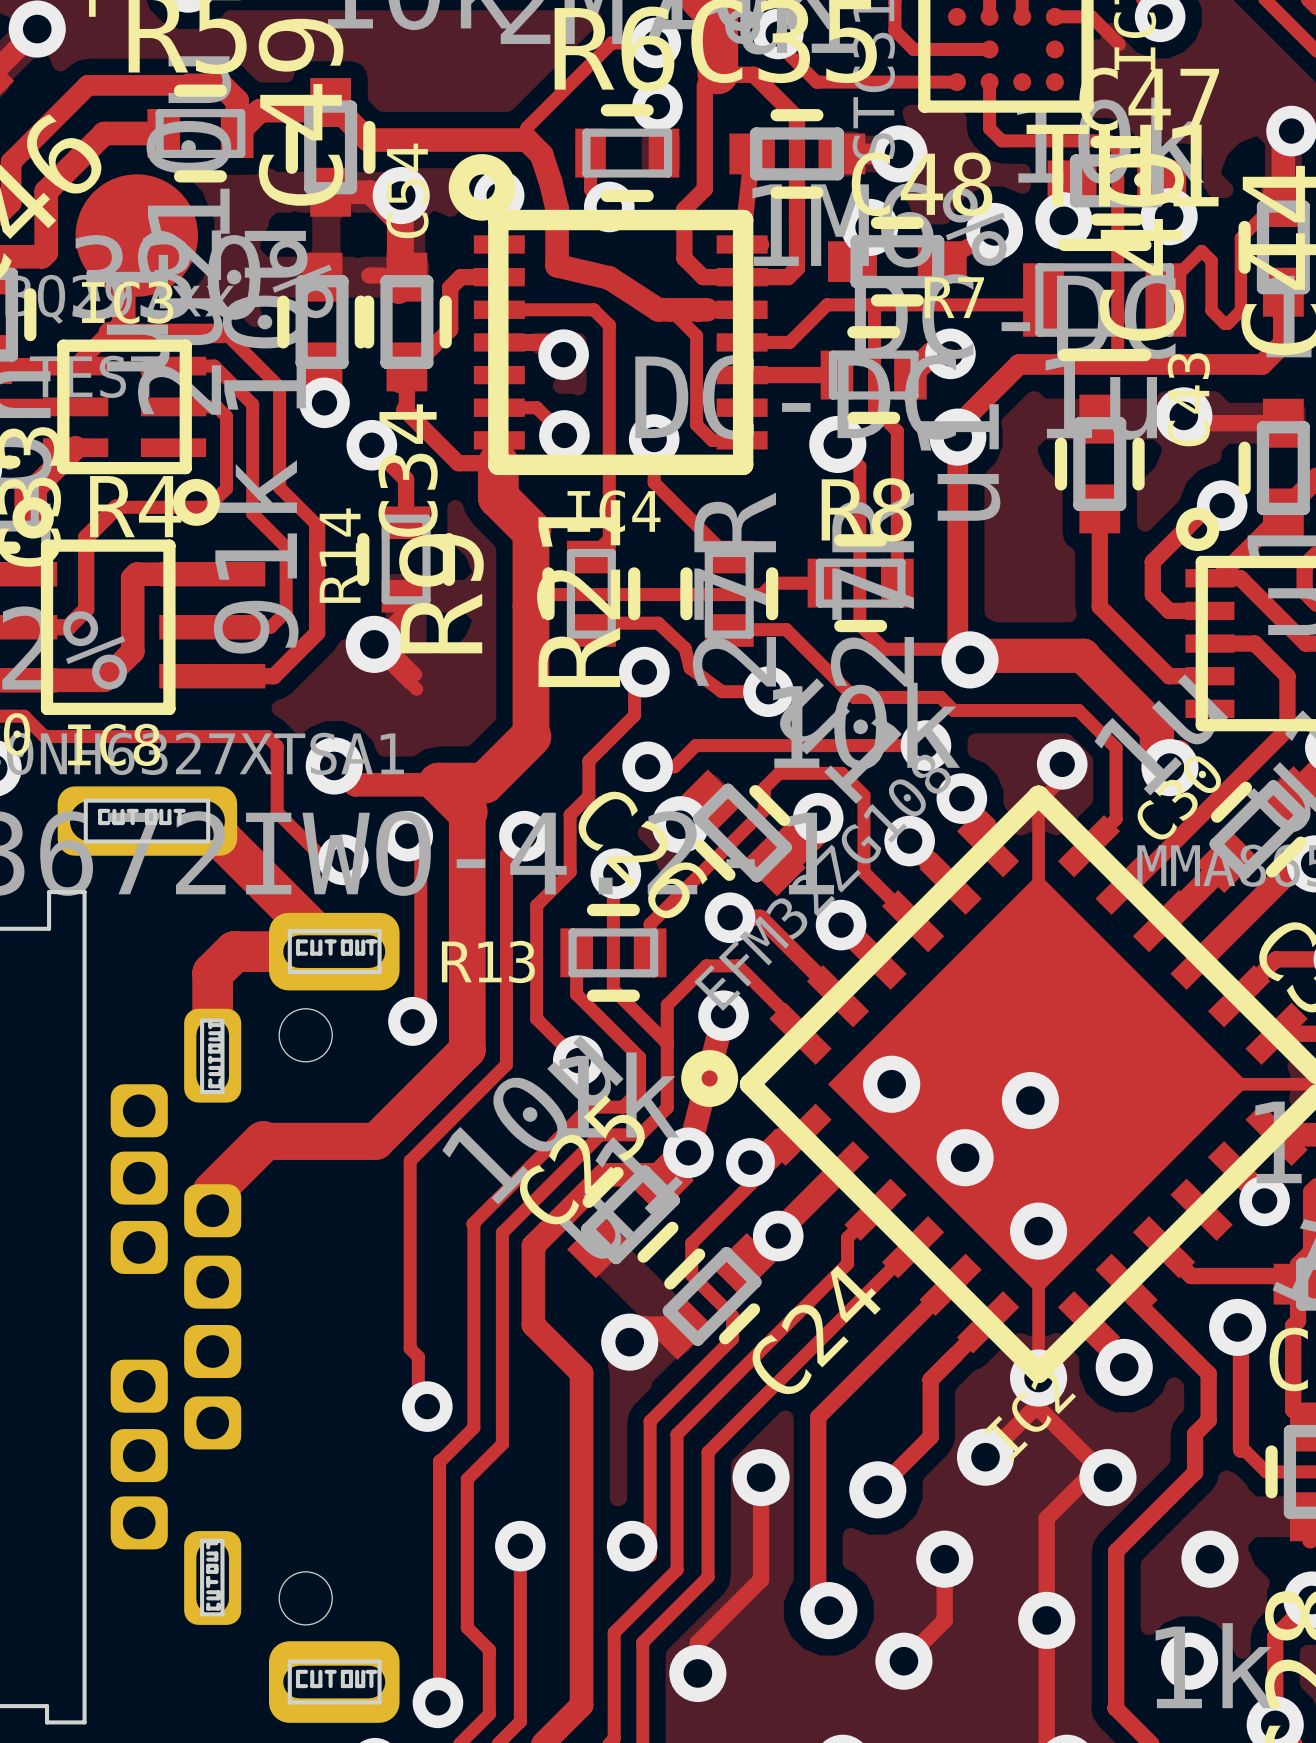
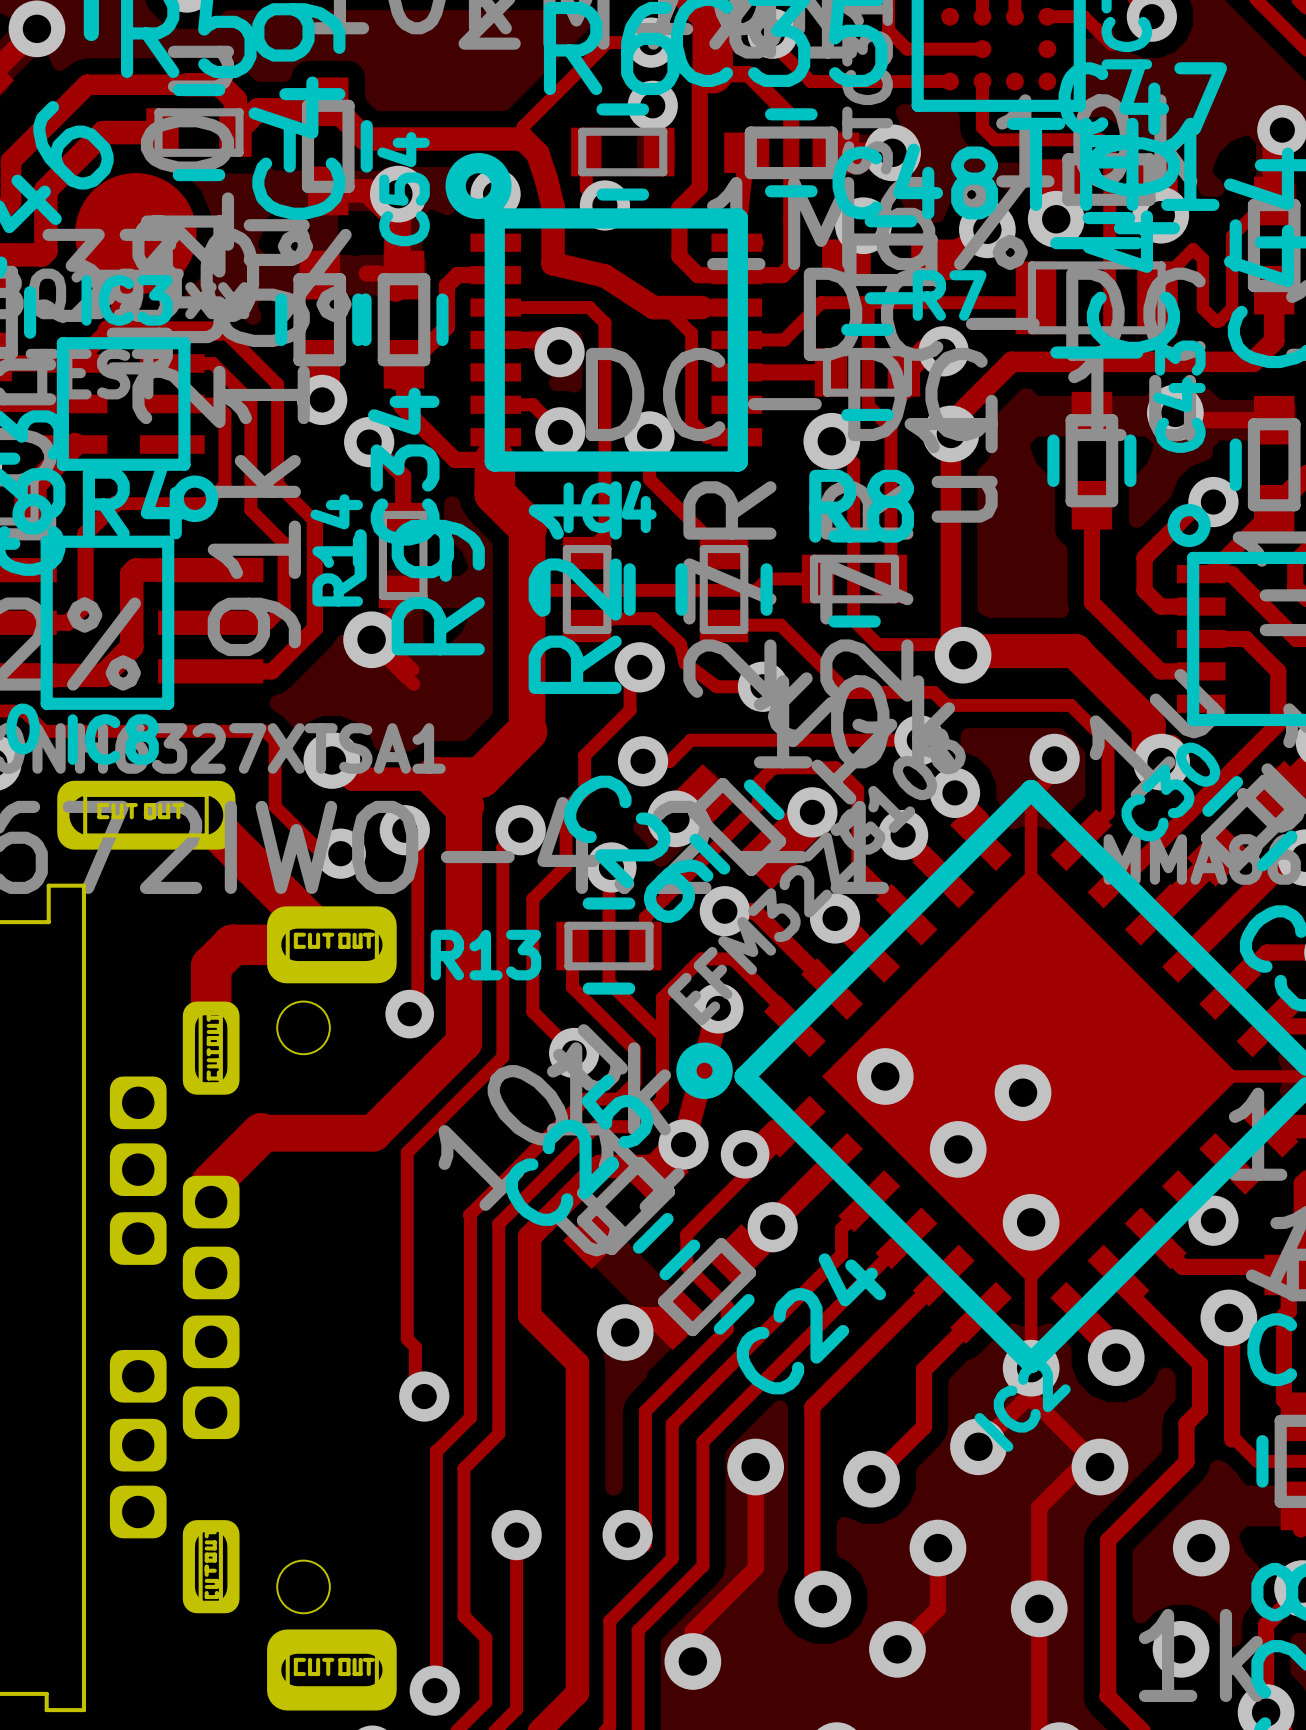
via position: (1264, 1200) -> (1213, 1220)

